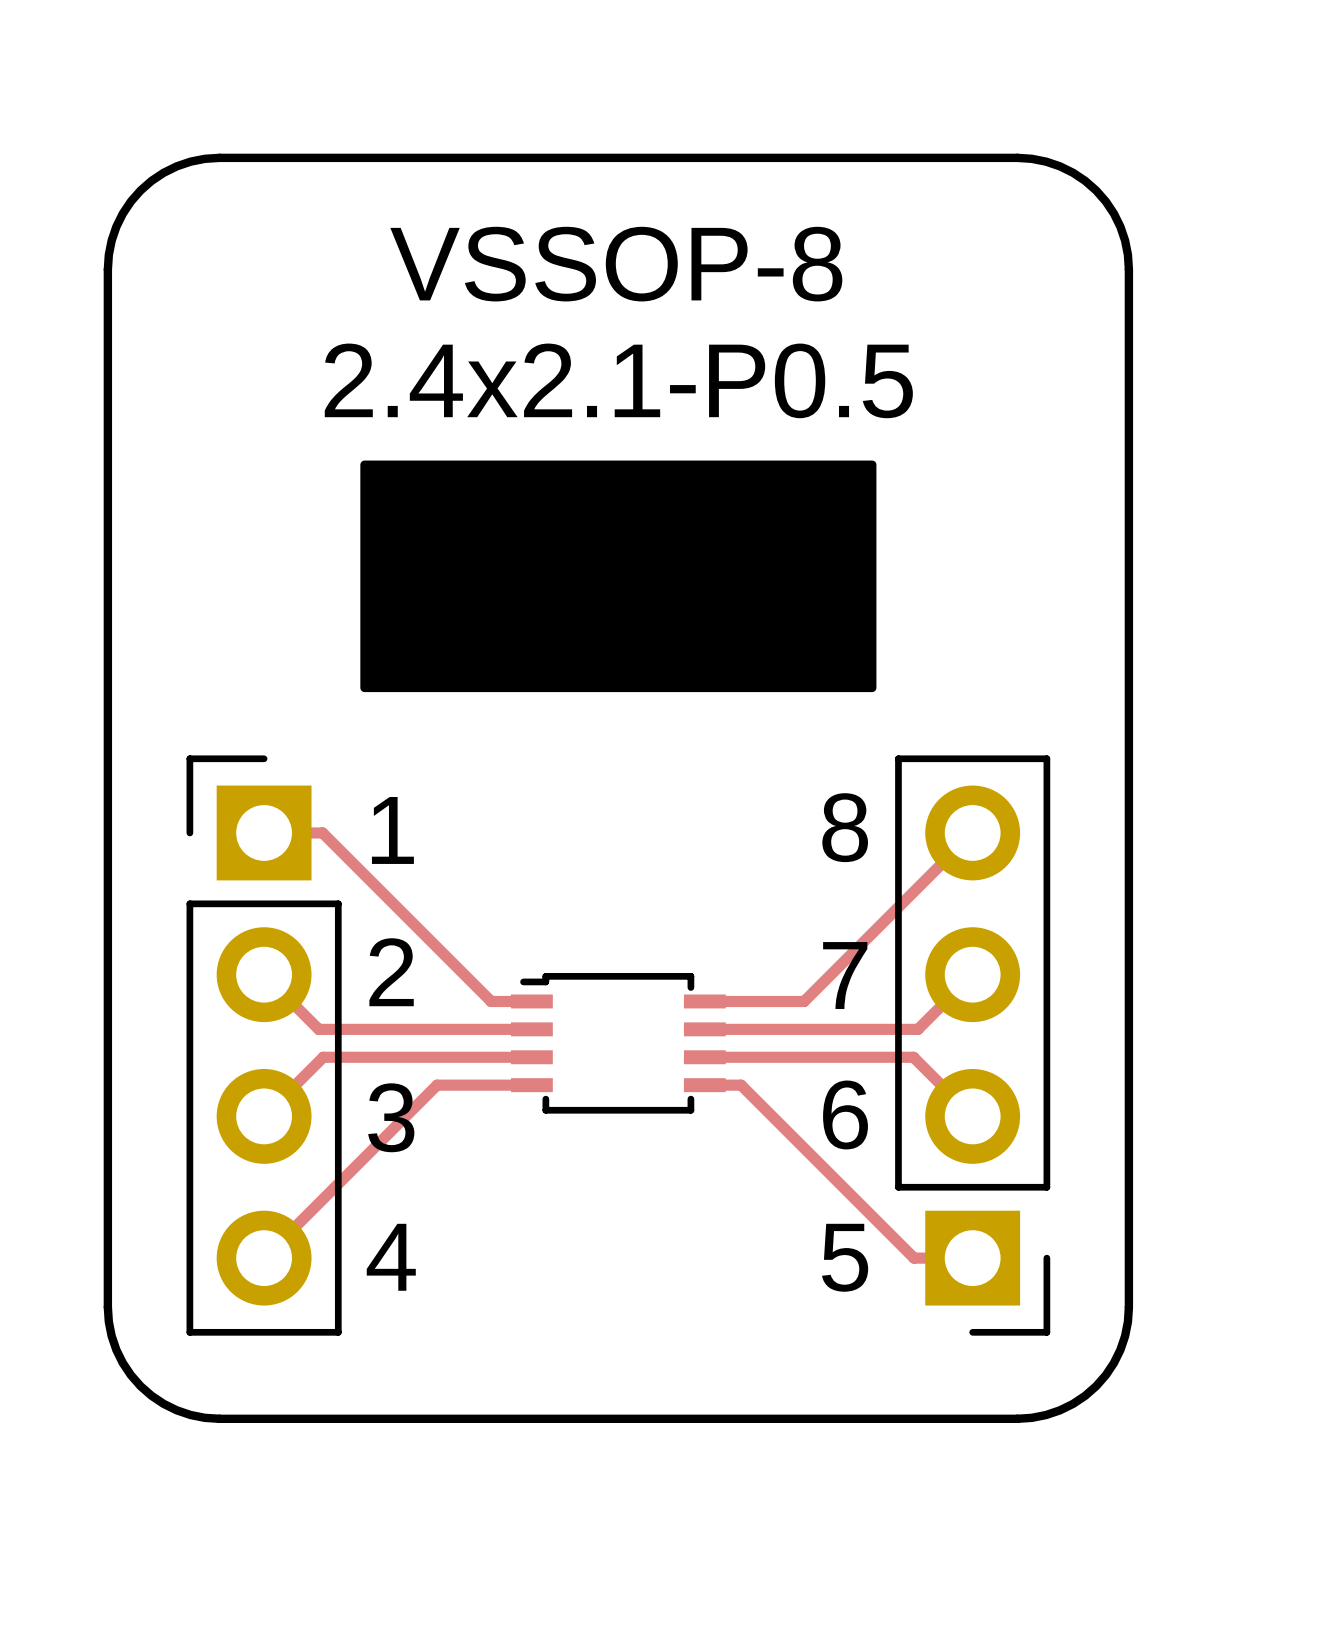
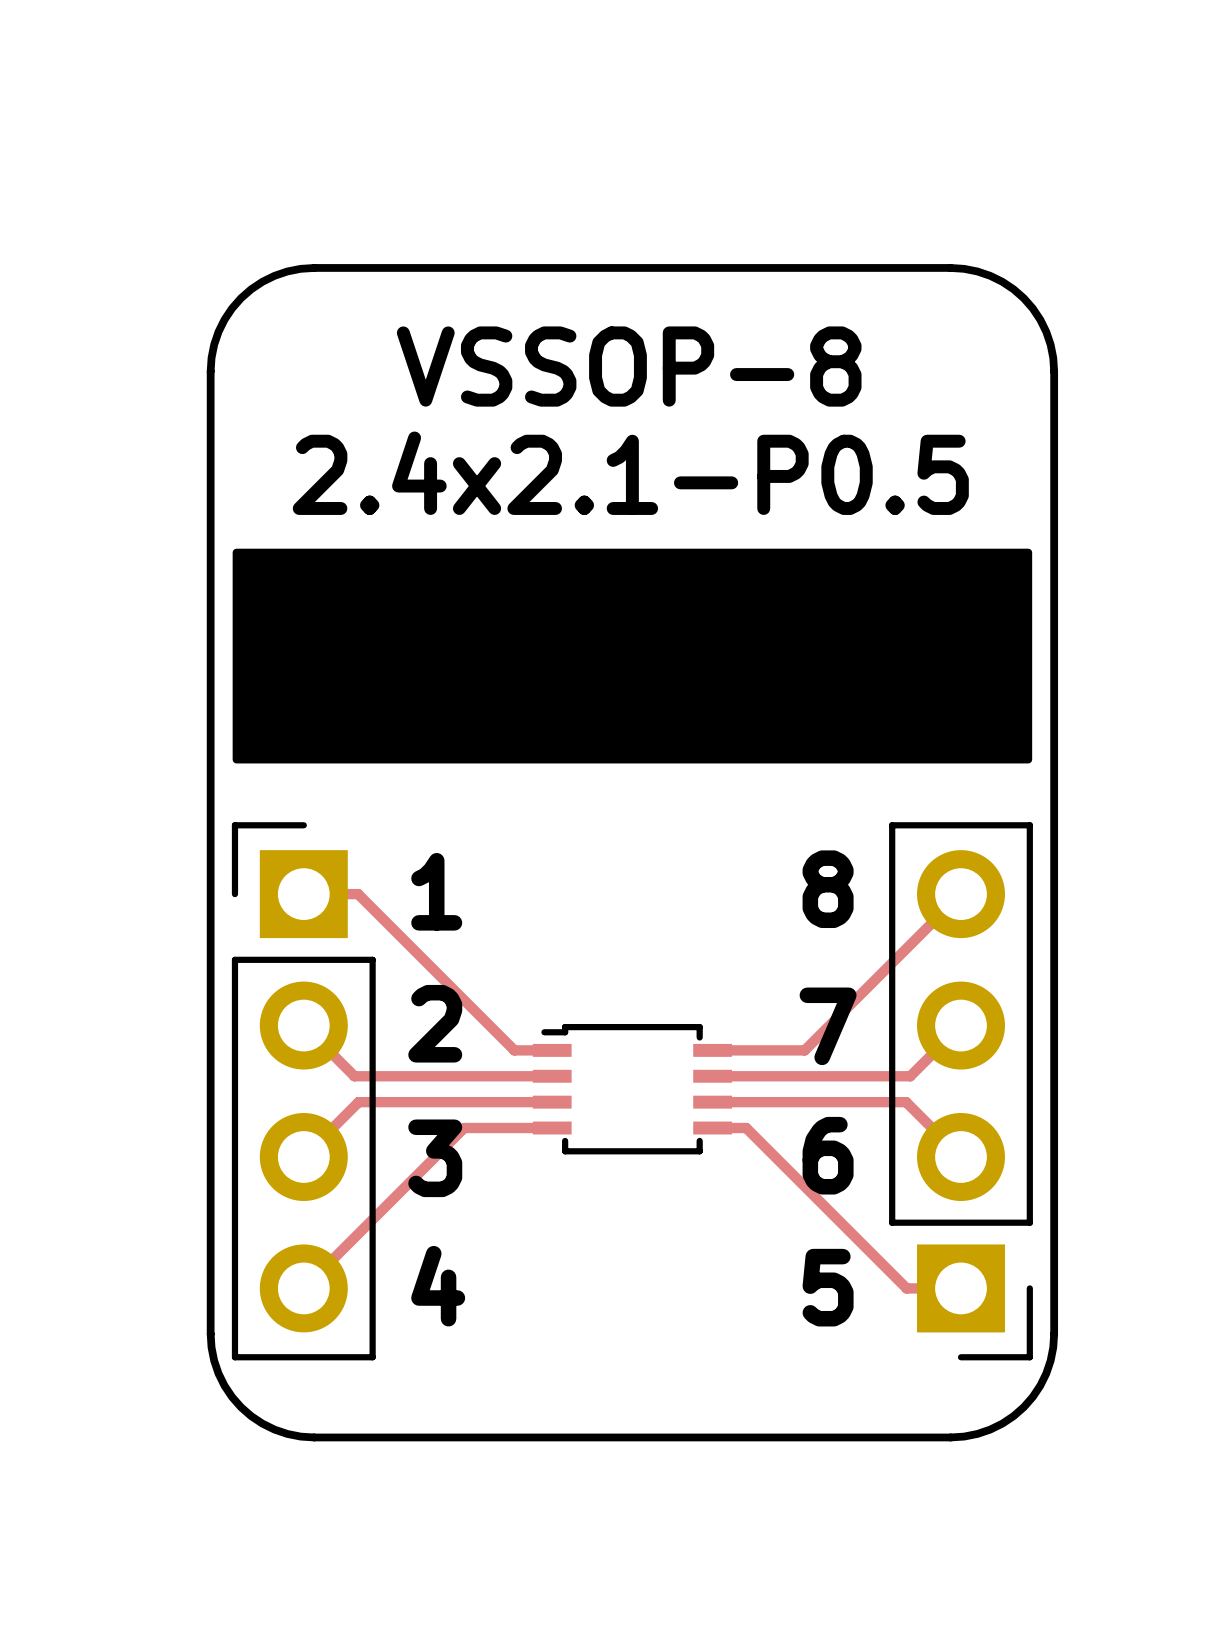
board edge: (275, 157) (204, 158) (190, 161) (163, 172) (140, 190) (122, 213) (111, 240) (107, 269) (108, 1321) (116, 1349) (130, 1375) (151, 1395) (163, 1403) (176, 1410) (204, 1417) (275, 1418) -> (314, 267) (287, 271) (274, 275) (251, 289) (240, 298) (232, 308) (218, 331) (214, 344) (210, 371) (211, 1347) (218, 1373) (232, 1396) (240, 1407) (262, 1423) (274, 1429) (287, 1433) (314, 1437)
board edge: (961, 157) (1031, 158) (1046, 161) (1073, 172) (1096, 190) (1113, 213) (1125, 240) (1128, 269) (1127, 1321) (1120, 1349) (1113, 1363) (1096, 1386) (1073, 1403) (1060, 1410) (1031, 1417) (961, 1418) -> (950, 267) (977, 271) (990, 275) (1013, 289) (1023, 298) (1040, 319) (1046, 331) (1050, 344) (1054, 371) (1053, 1347) (1046, 1373) (1040, 1385) (1032, 1396) (1013, 1416) (990, 1429) (977, 1433) (950, 1437)
drawing shape: [360, 460, 877, 693] -> [232, 548, 1033, 764]

